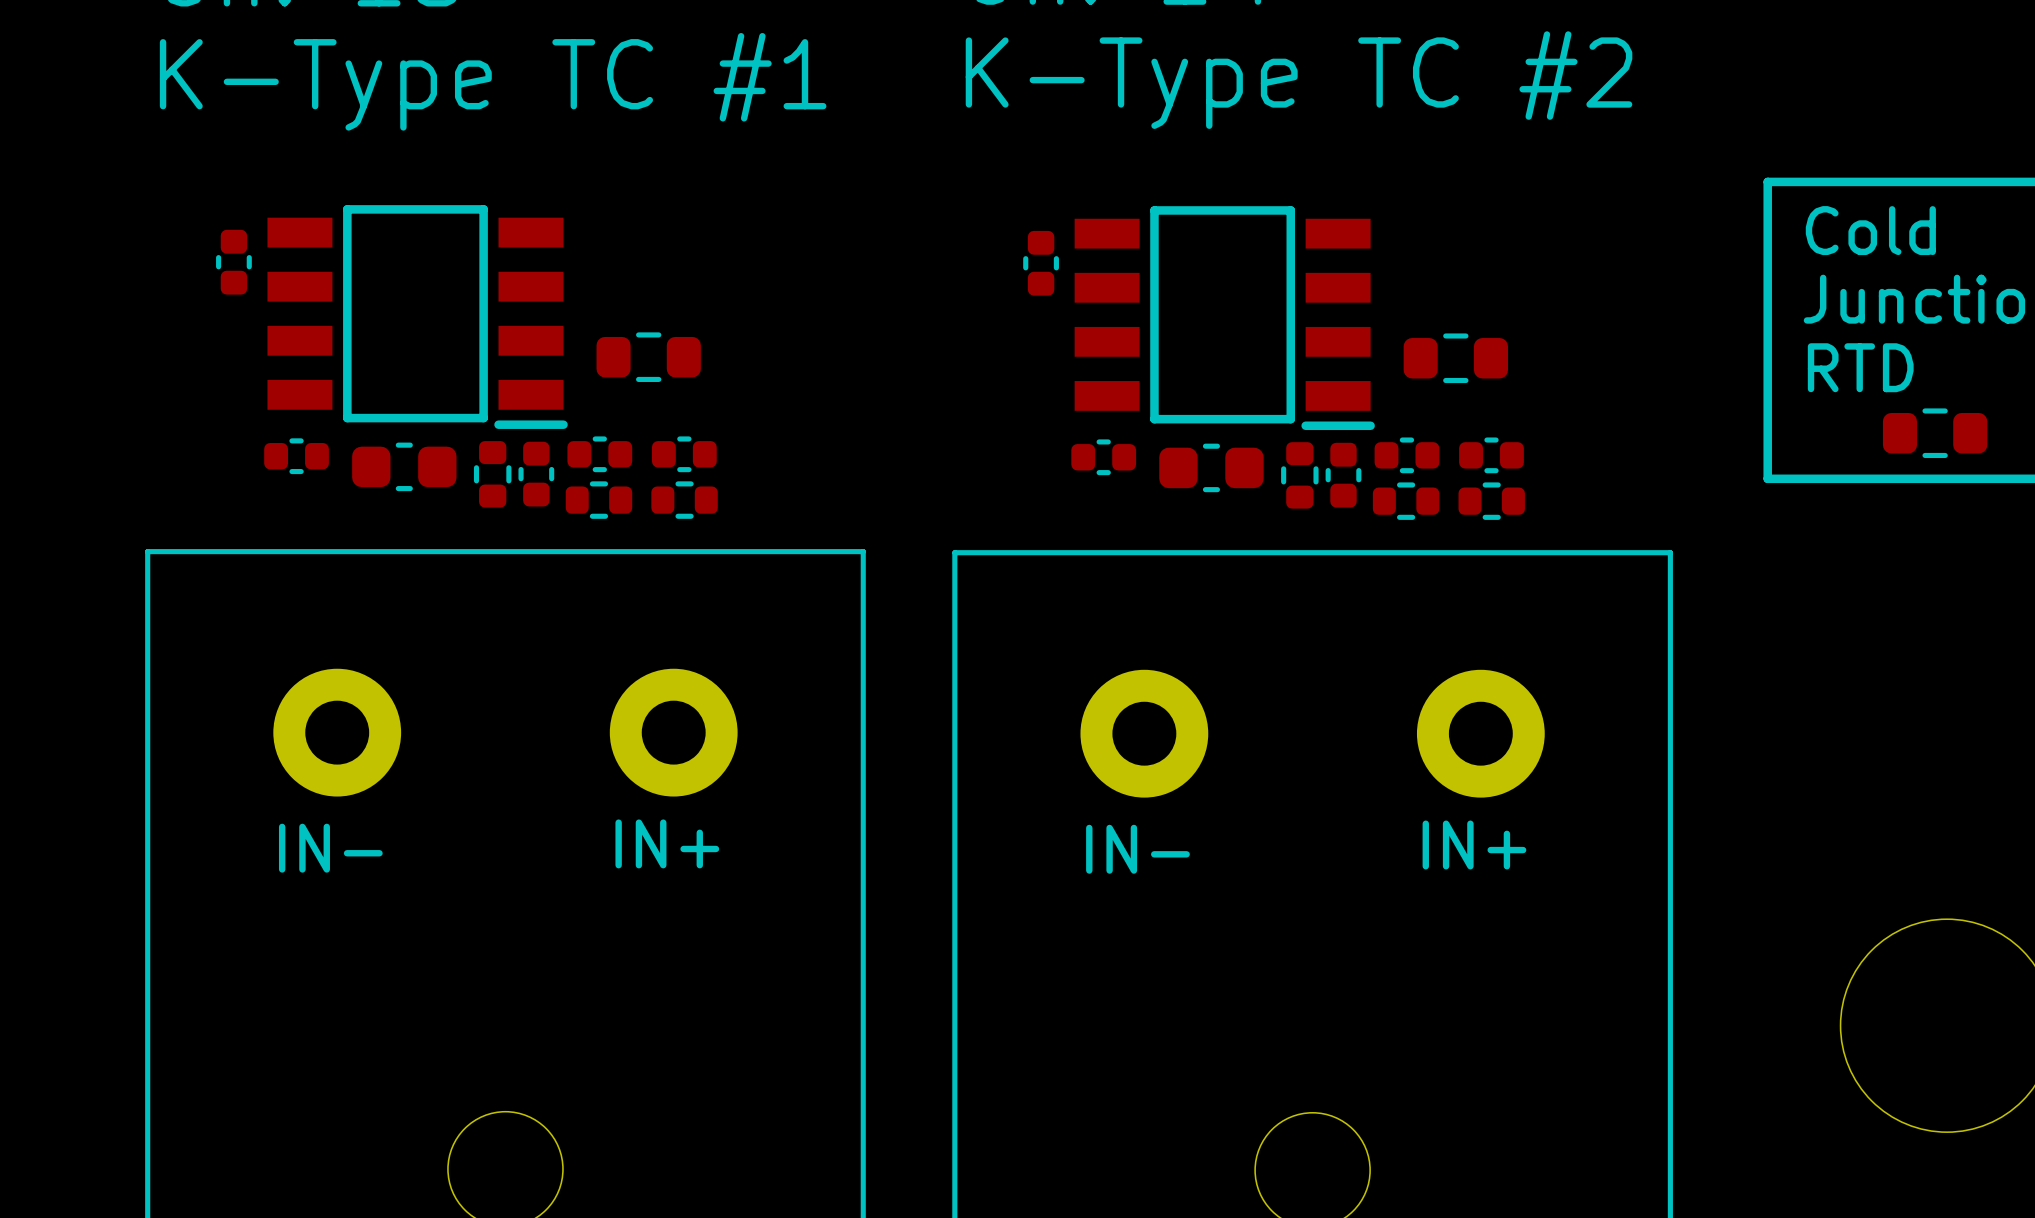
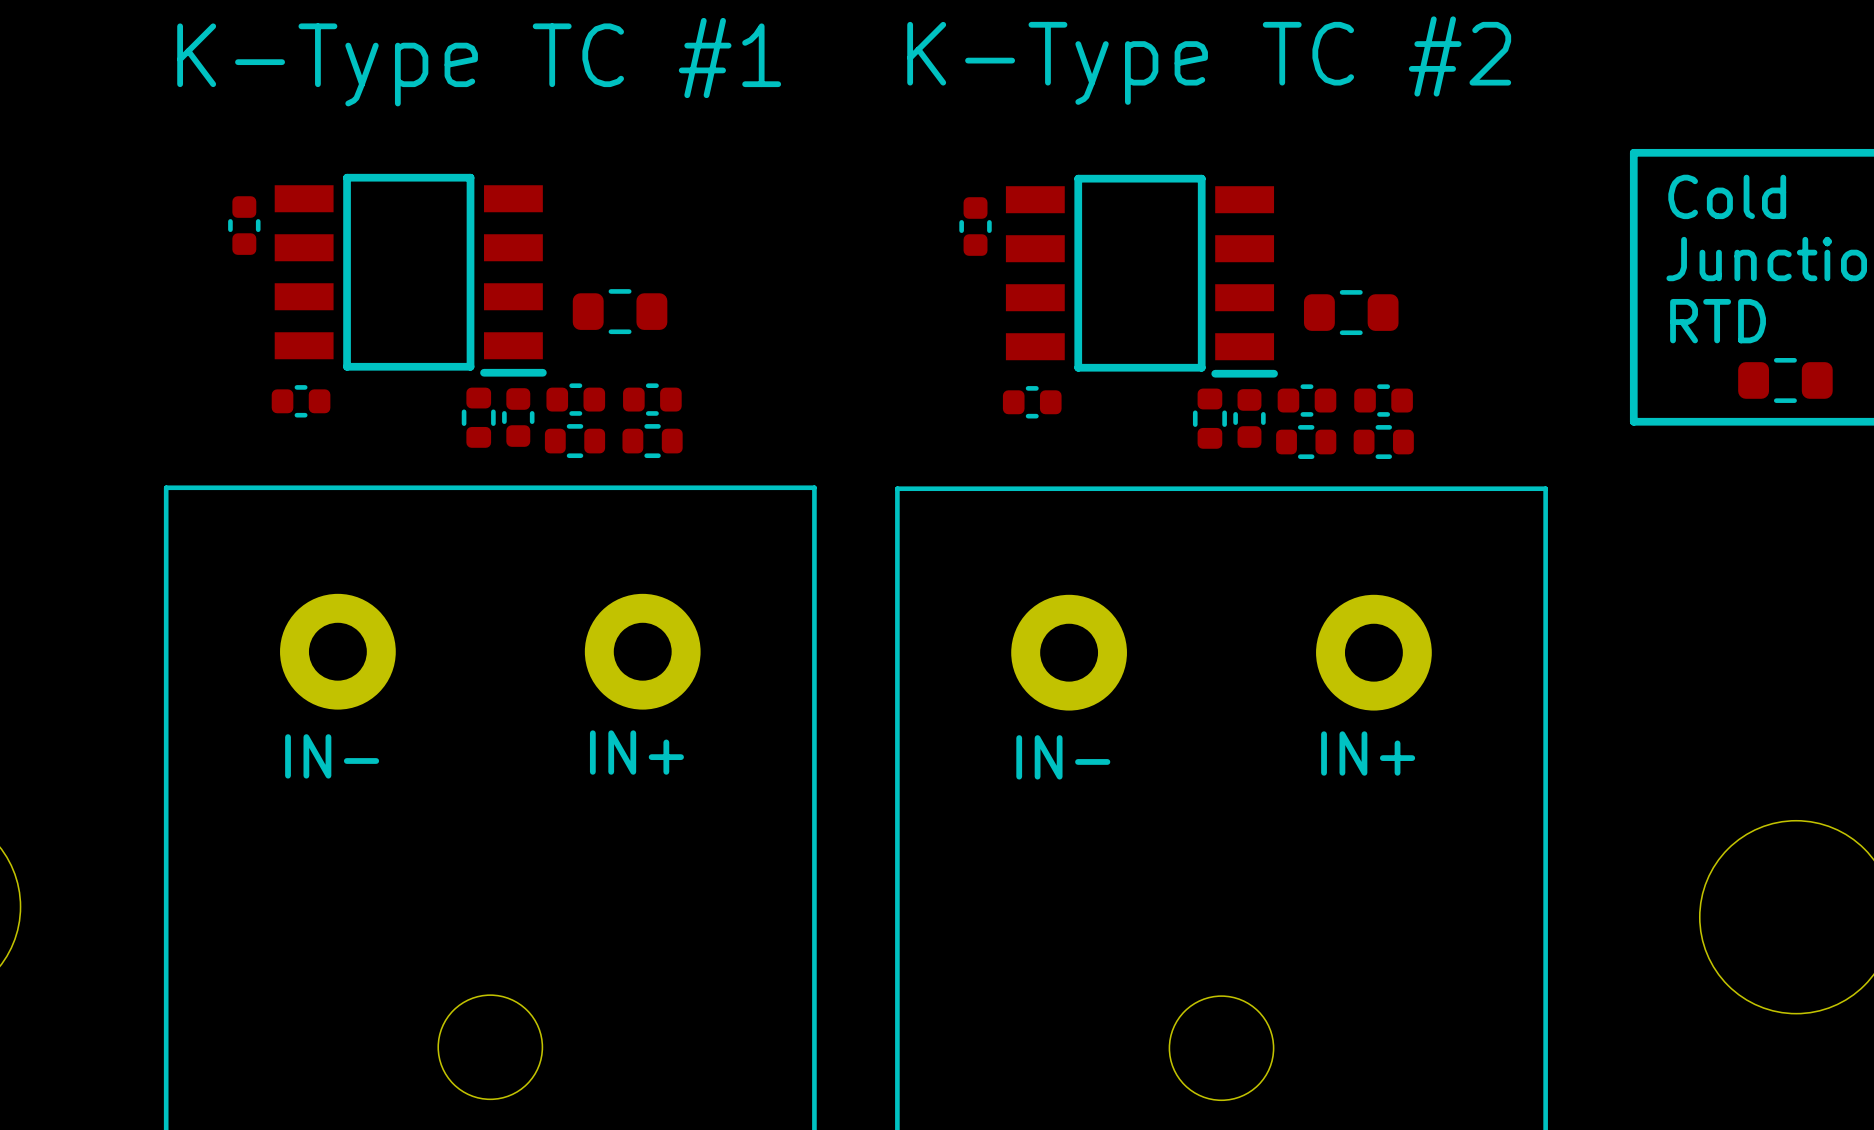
part: (404, 466) -> none
part: (1211, 467) -> none

